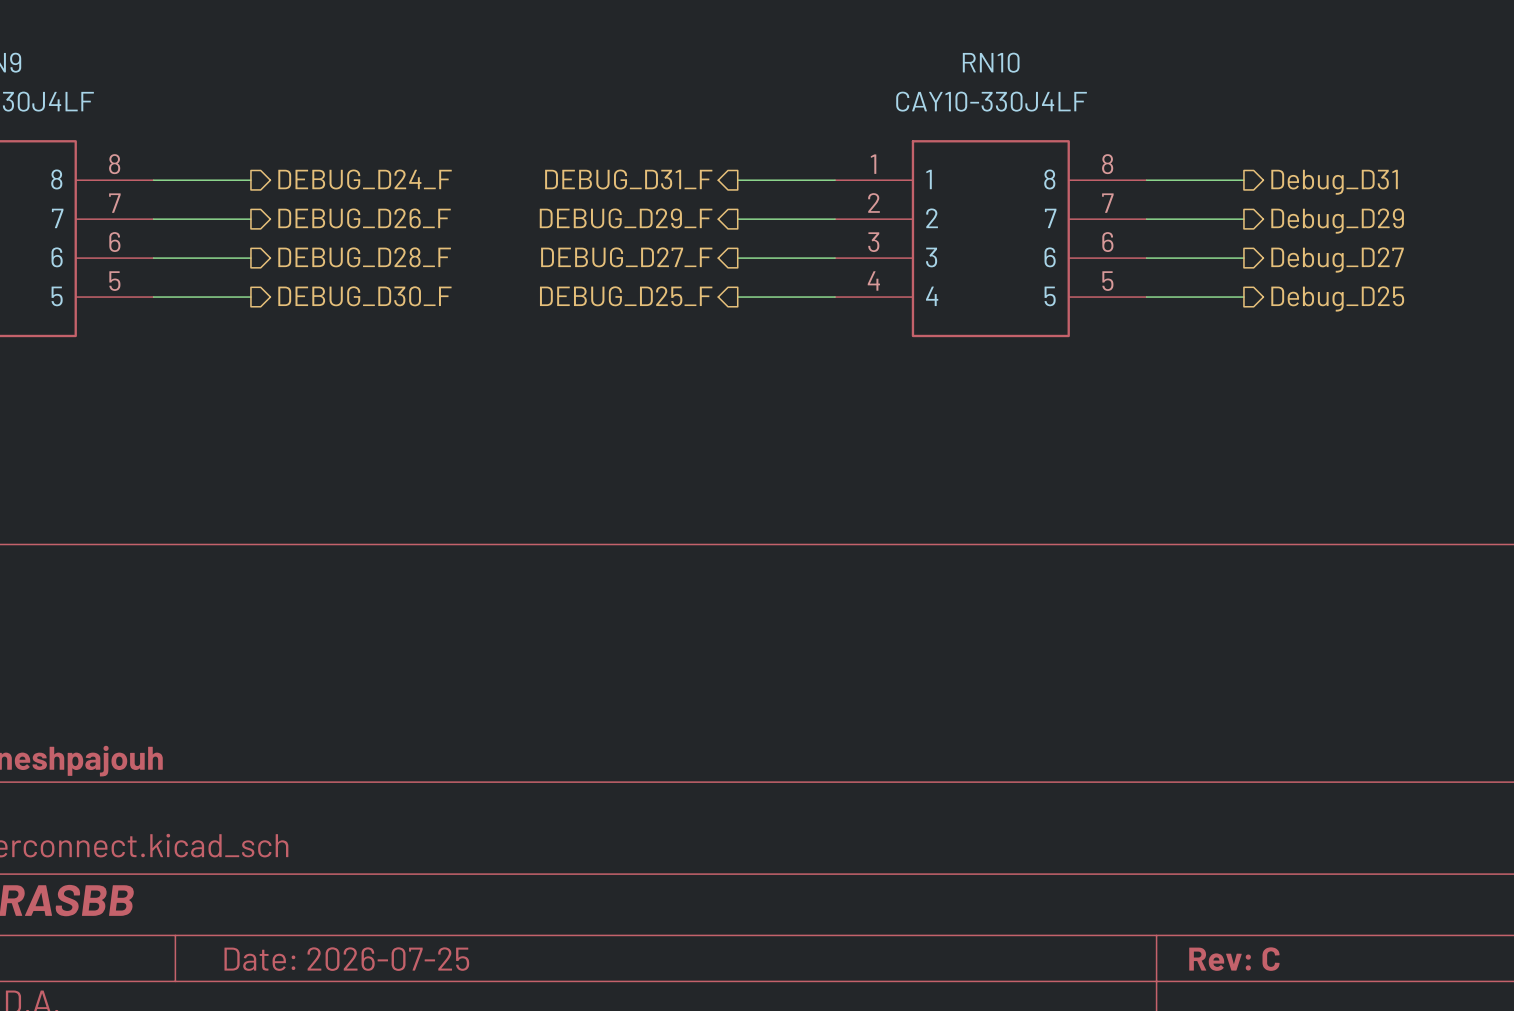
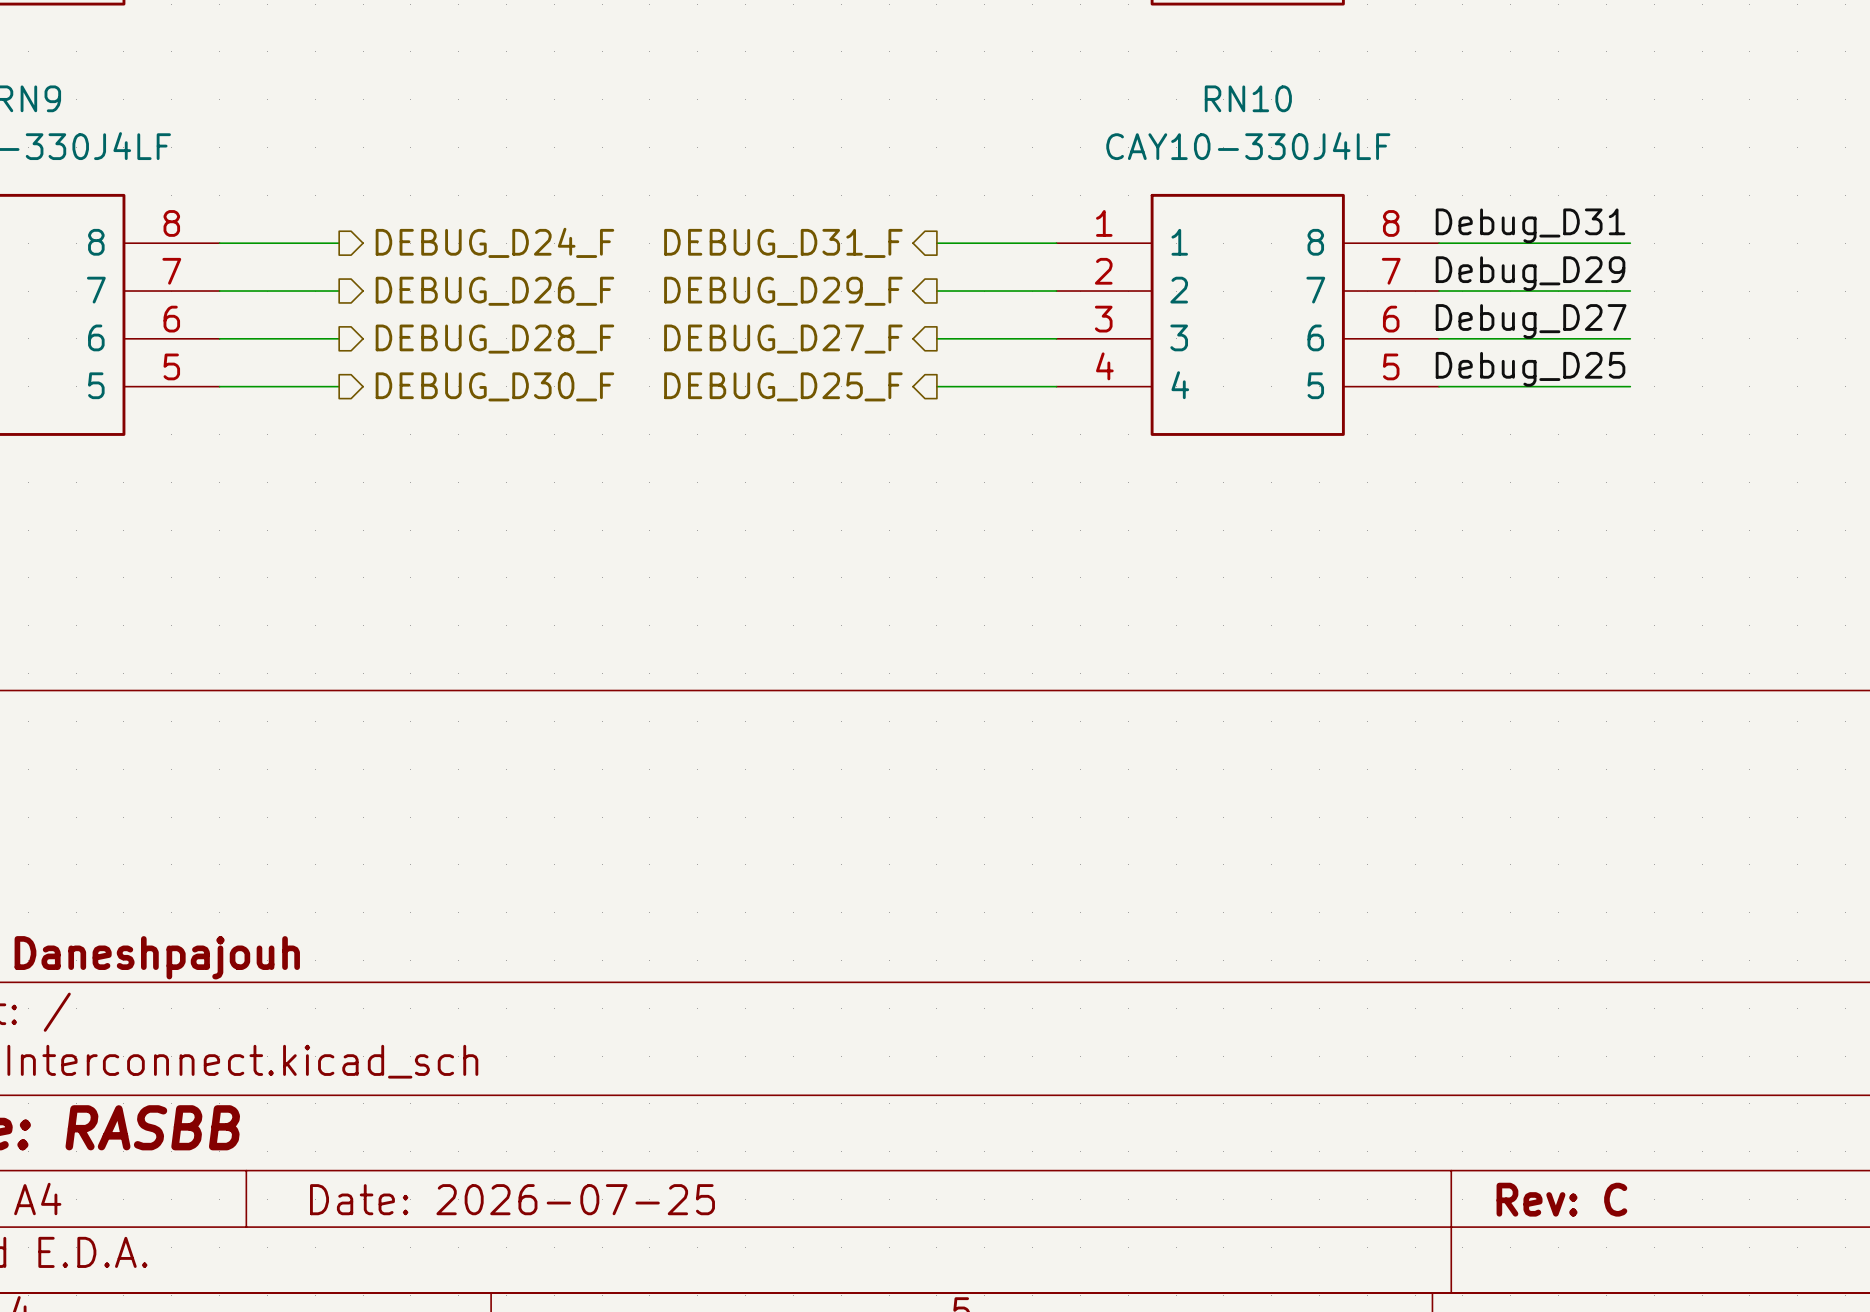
label: none -> Debug_D31 (1530, 225)
wire: none -> (1558, 243) (1630, 243)
hierarchical label: Debug_D31 (1334, 182) -> none
label: none -> Debug_D29 (1530, 273)
wire: none -> (1558, 291) (1630, 291)
hierarchical label: Debug_D29 (1337, 221) -> none
label: none -> Debug_D27 (1531, 321)
wire: none -> (1558, 338) (1630, 338)
hierarchical label: Debug_D27 (1337, 260) -> none
label: none -> Debug_D25 (1530, 369)
wire: none -> (1558, 386) (1630, 386)
hierarchical label: Debug_D25 (1337, 298) -> none

